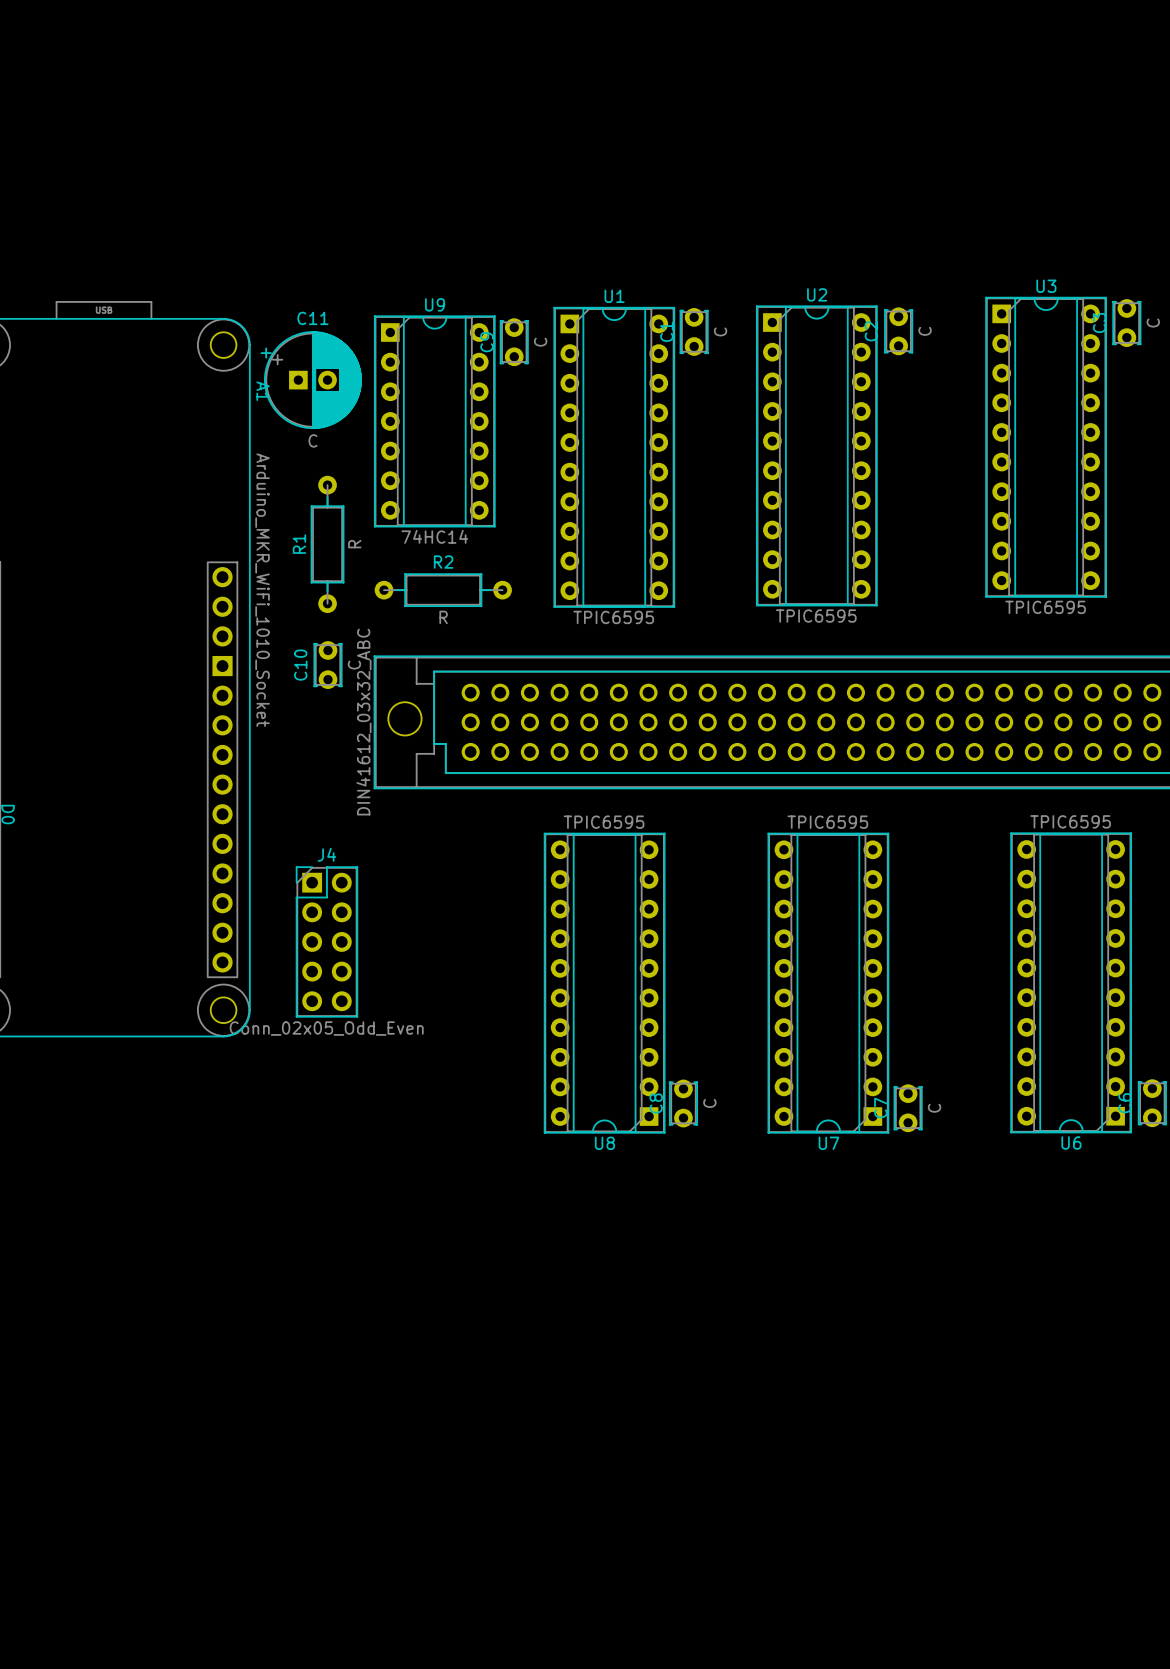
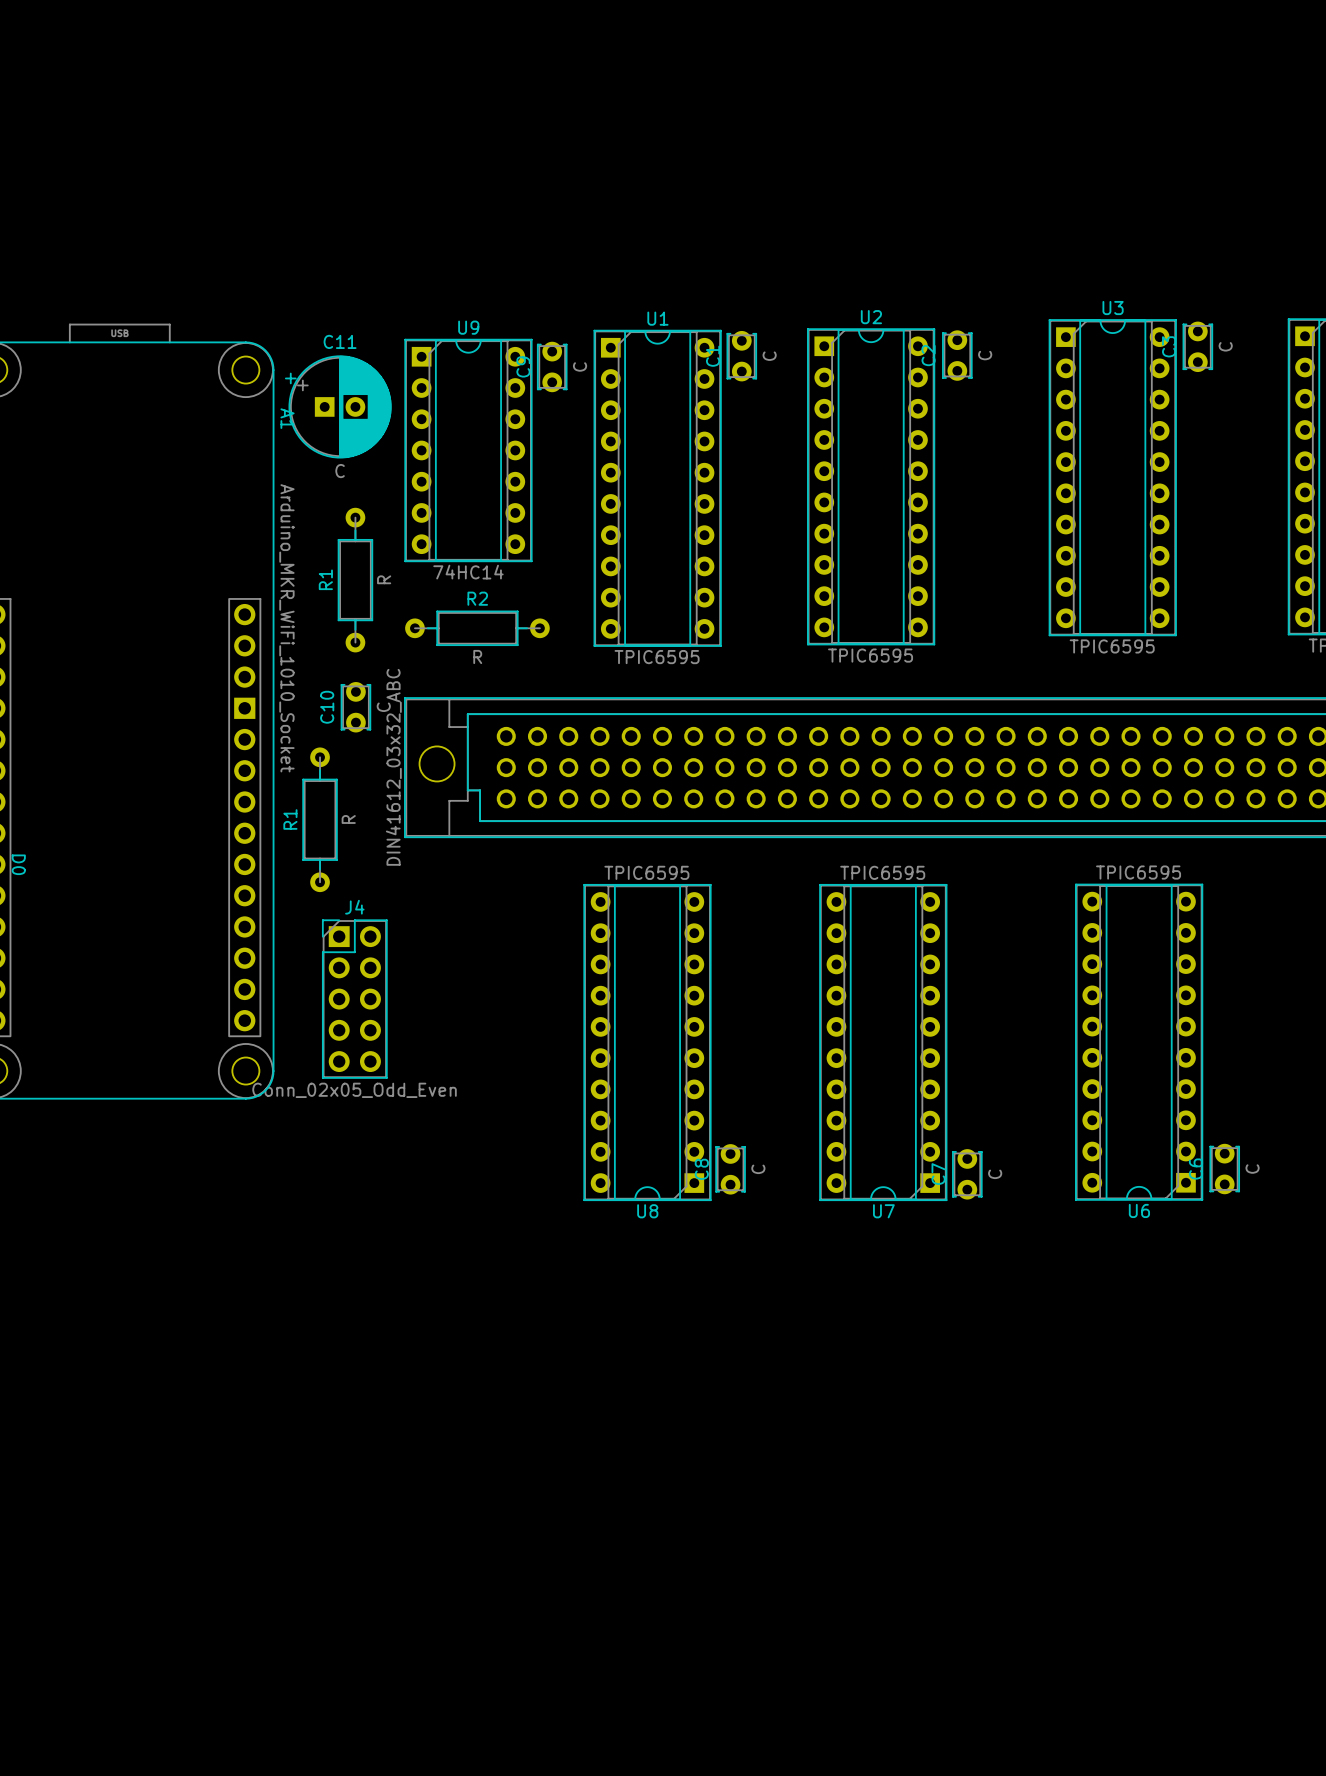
R1: none -> R (320, 819)

